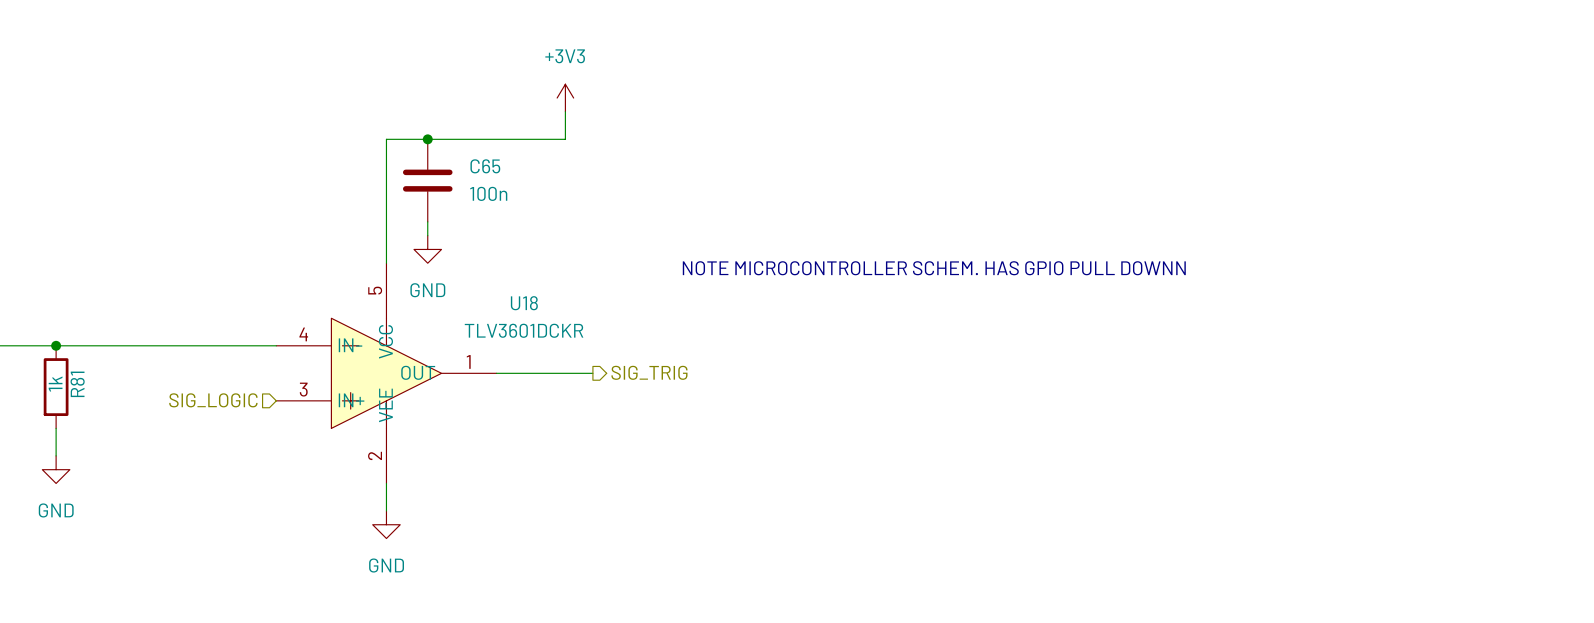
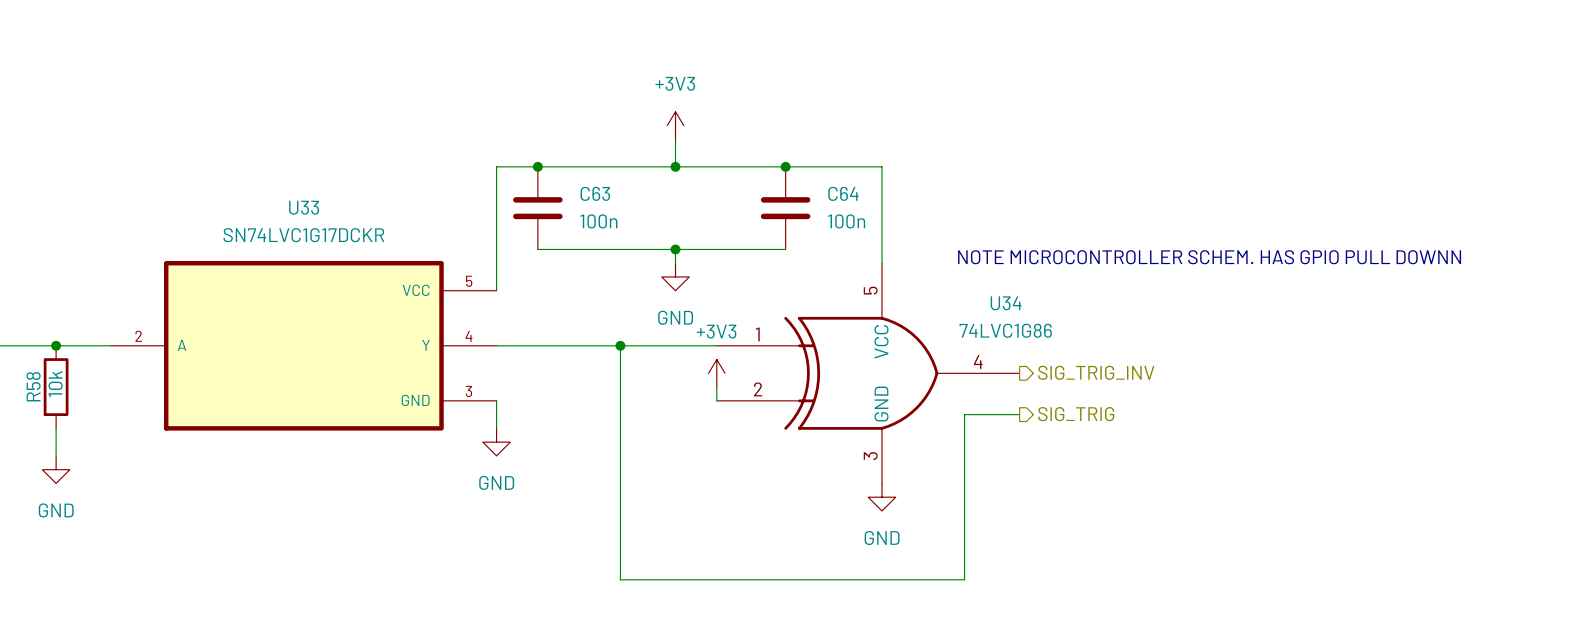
power symbol position: +3V3 (565, 98) -> +3V3 (675, 125)
wire: (565, 111) (565, 139) (386, 139) (386, 263) -> none
junction: (427, 139) -> none
wire: none -> (675, 139) (675, 166)
junction: none -> (537, 166)
junction: none -> (675, 166)
junction: none -> (785, 166)
C65: 100n (427, 180) -> none
C63: none -> 100n (537, 208)
C64: none -> 100n (785, 208)
wire: (427, 221) (427, 235) -> (675, 249) (675, 263)
power symbol: GND (427, 249) -> none
wire: none -> (537, 249) (785, 249)
junction: none -> (675, 249)
text: none -> NOTE MICROCONTROLLER SCHEM. HAS GPIO PULL DOWNN (1209, 257)
wire: none -> (881, 263) (881, 166) (496, 166) (496, 290)
text: NOTE MICROCONTROLLER SCHEM. HAS GPIO PULL DOWNN (934, 268) -> none
power symbol: none -> GND (675, 276)
U33: none -> SN74LVC1G17DCKR (303, 345)
wire: none -> (496, 345) (716, 345)
wire: none -> (620, 345) (620, 579) (964, 579) (964, 414) (1019, 414)
junction: none -> (620, 345)
hierarchical label: SIG_TRIG (649, 372) -> none
hierarchical label: none -> SIG_TRIG_INV (1096, 372)
U18: TLV3601DCKR (386, 373) -> none
wire: (496, 373) (592, 373) -> none
power symbol: none -> +3V3 (716, 373)
U34: none -> 74LVC1G86 (868, 373)
R81 value: 1k (55, 384) -> 10k (55, 384)
R81 name: R81 (77, 384) -> R58 (33, 386)
wire: none -> (716, 387) (716, 400)
hierarchical label: SIG_LOGIC (213, 400) -> none
hierarchical label: none -> SIG_TRIG (1076, 414)
power symbol: none -> GND (496, 442)
wire: (386, 483) (386, 510) -> (496, 400) (496, 428)
power symbol: none -> GND (881, 497)
power symbol: GND (386, 524) -> none

